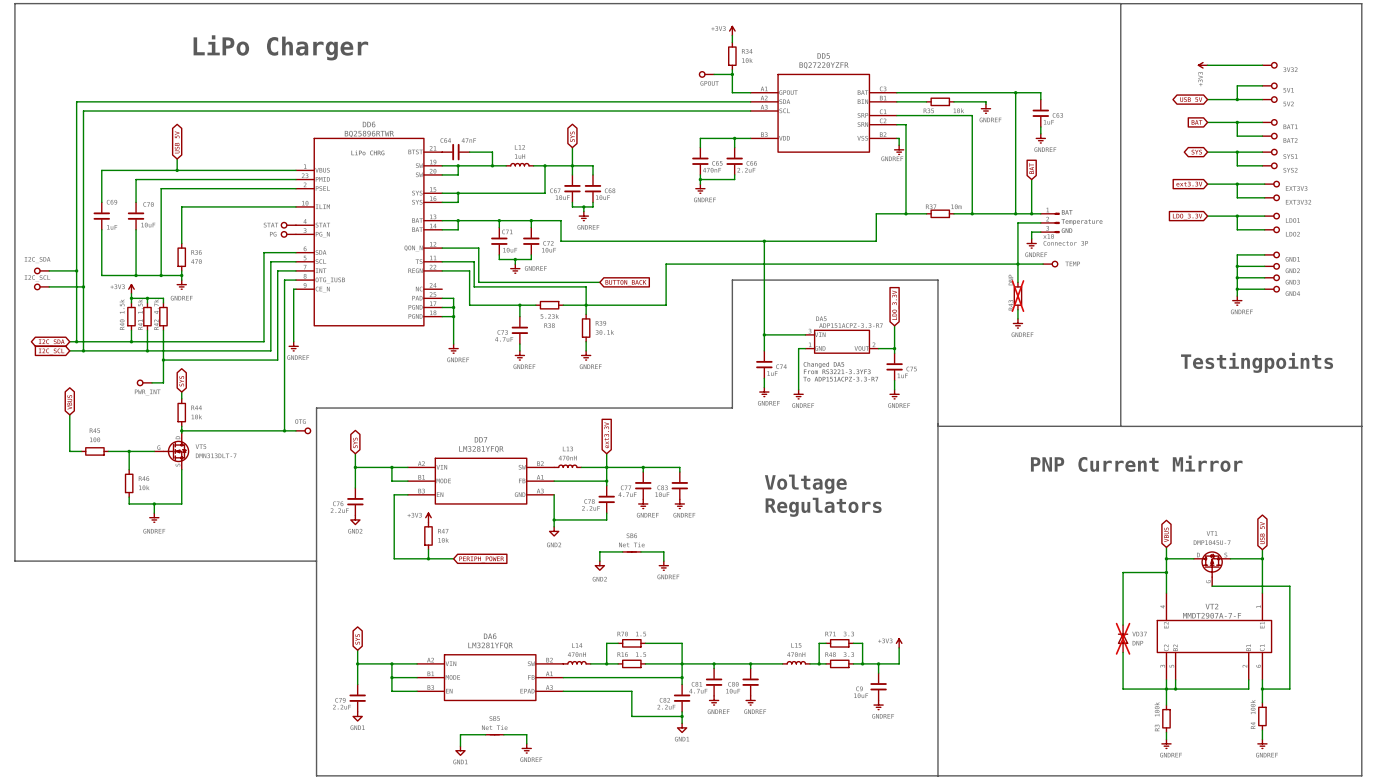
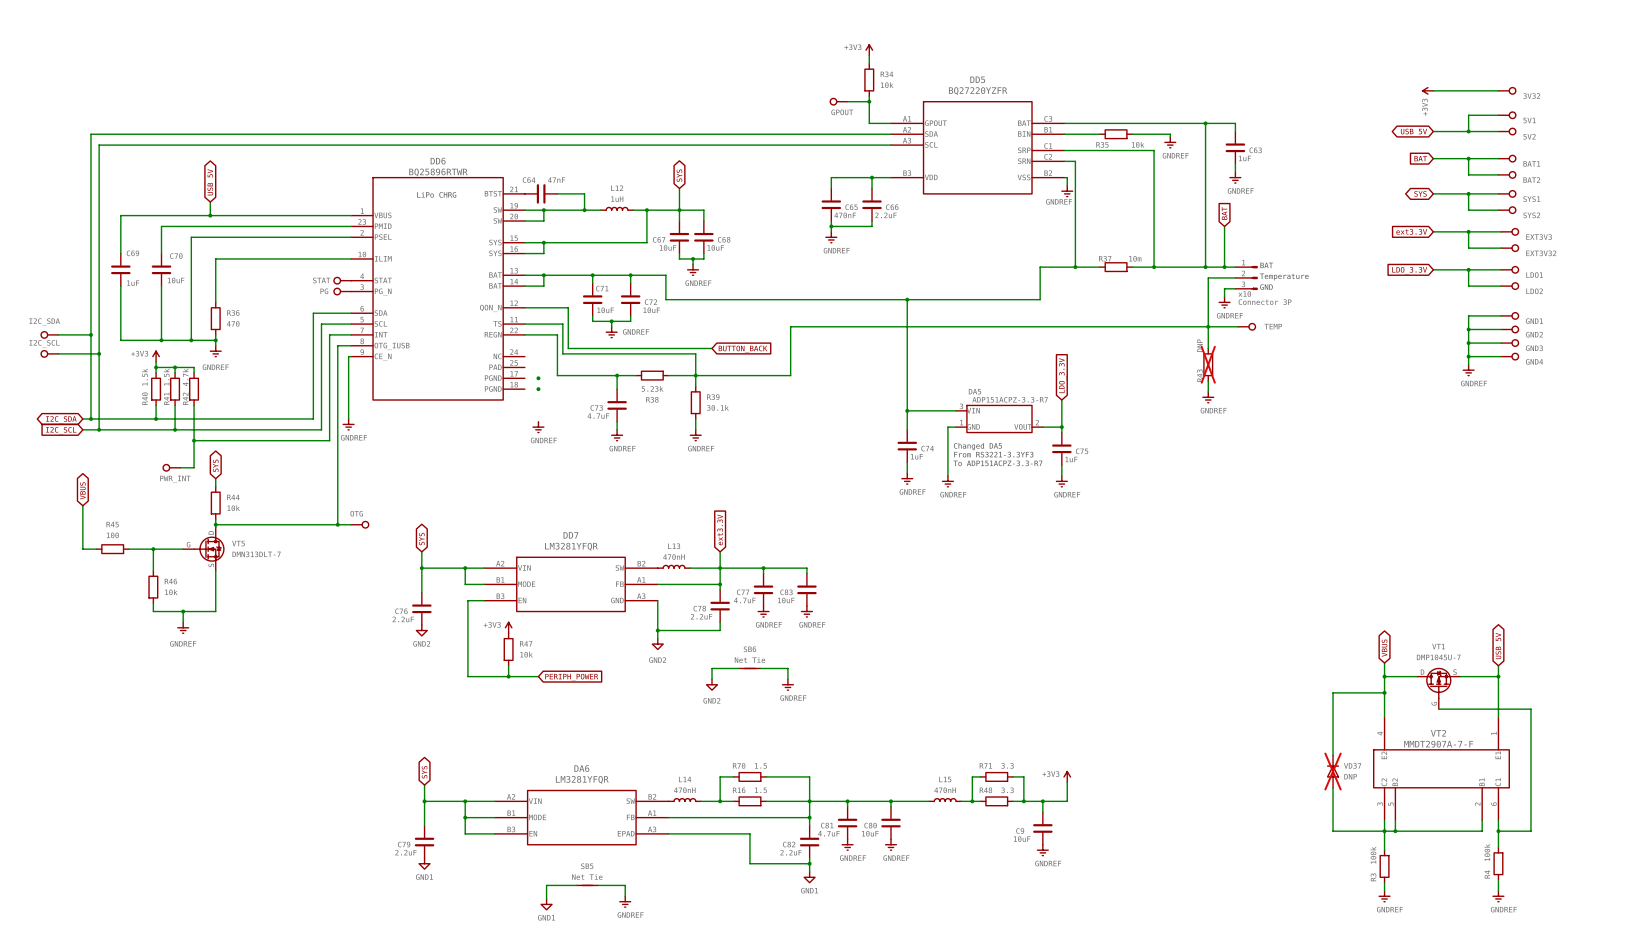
line: (1120, 3) (1361, 3) (1361, 775) (316, 775) (316, 408) (732, 408) (732, 280) (937, 280) (937, 775) -> none
text: LiPo Charger (280, 47) -> none
wire: (442, 298) (453, 298) (453, 344) -> none
wire: (442, 307) (453, 307) -> none
wire: (442, 316) (453, 316) -> none
text: Testingpoints (1257, 362) -> none
line: (937, 426) (1120, 426) (1120, 3) (14, 3) (14, 561) (316, 561) -> none
line: (1120, 426) (1361, 426) -> none
text: PNP Current Mirror (1136, 463) -> none
text: Voltage (805, 484) -> none
text: Regulators (823, 507) -> none

